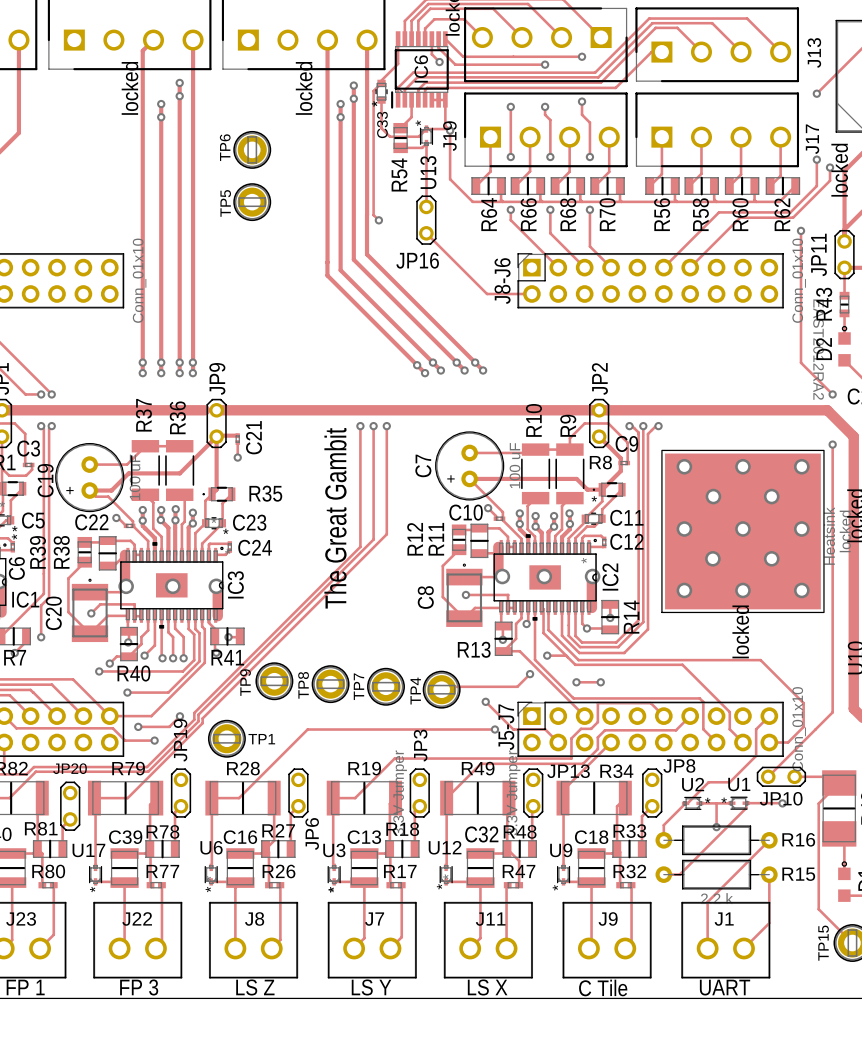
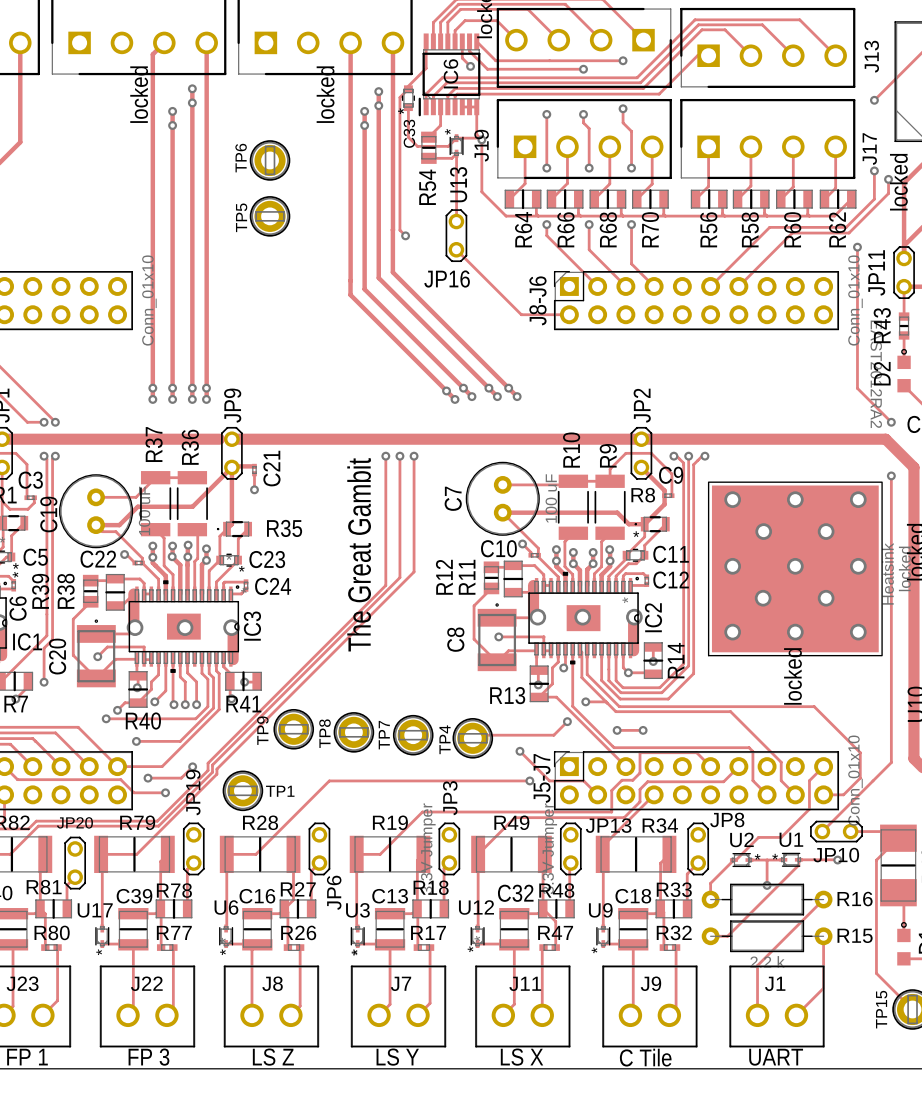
C7 text: + (450, 478) -> none
C19 text: + (69, 490) -> none

